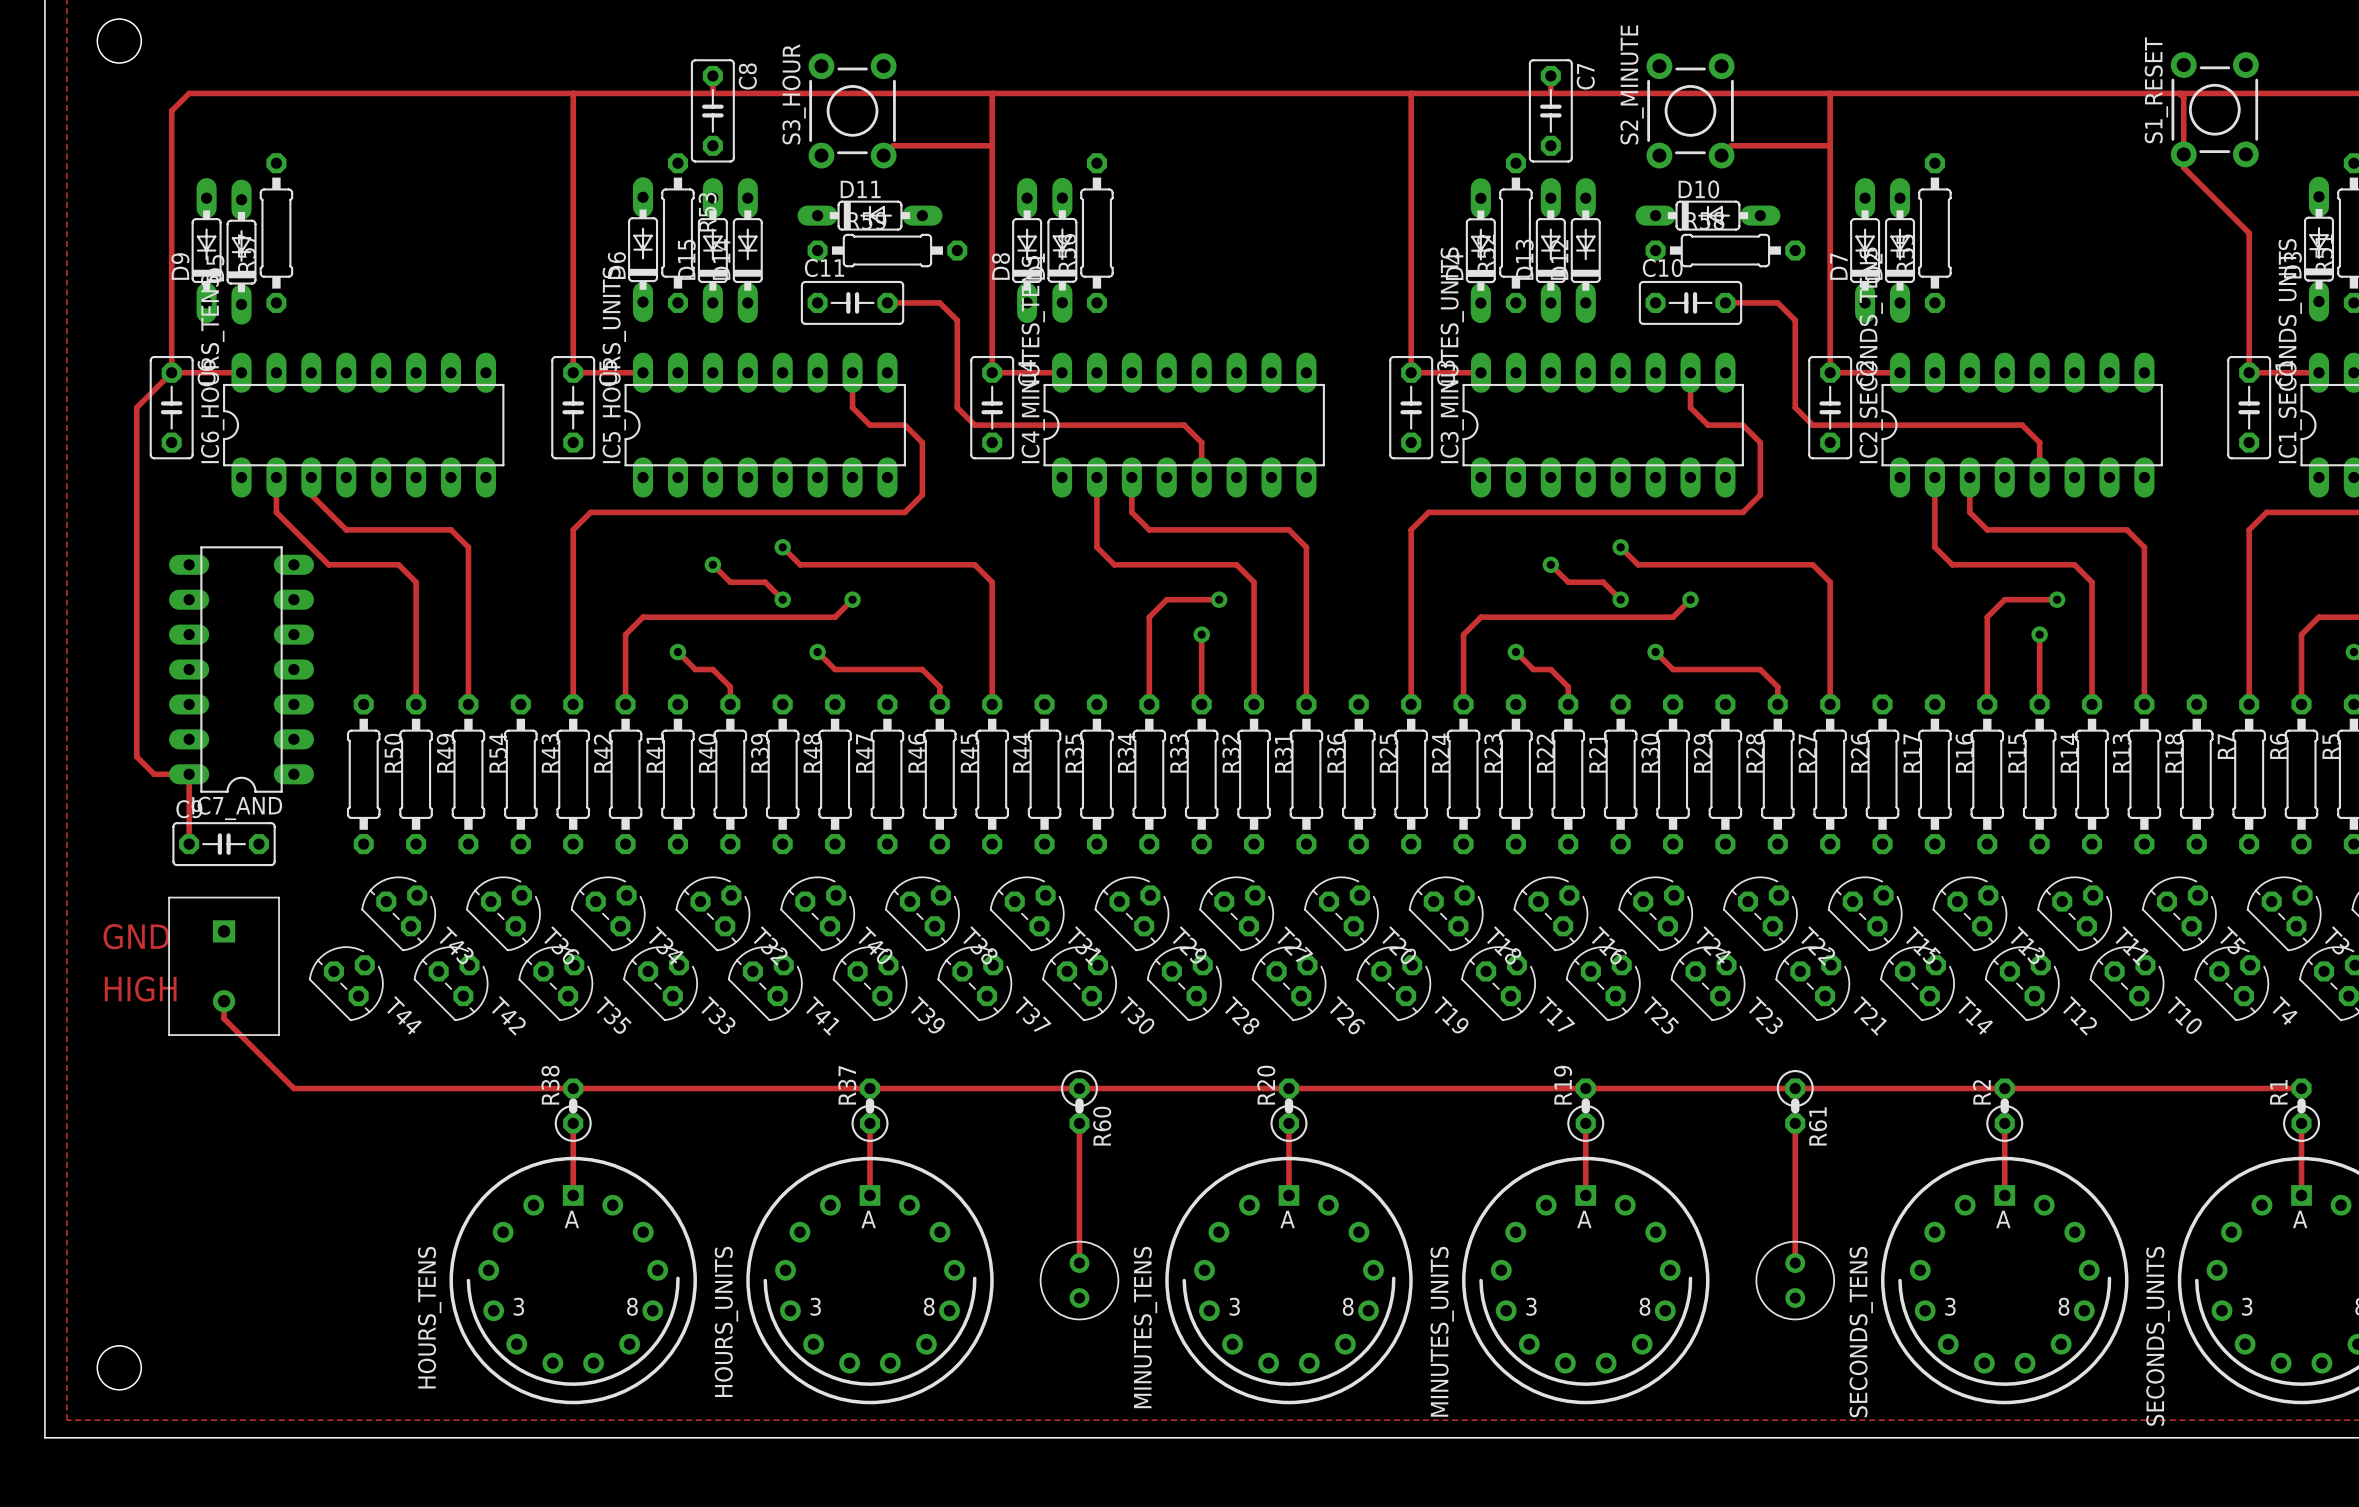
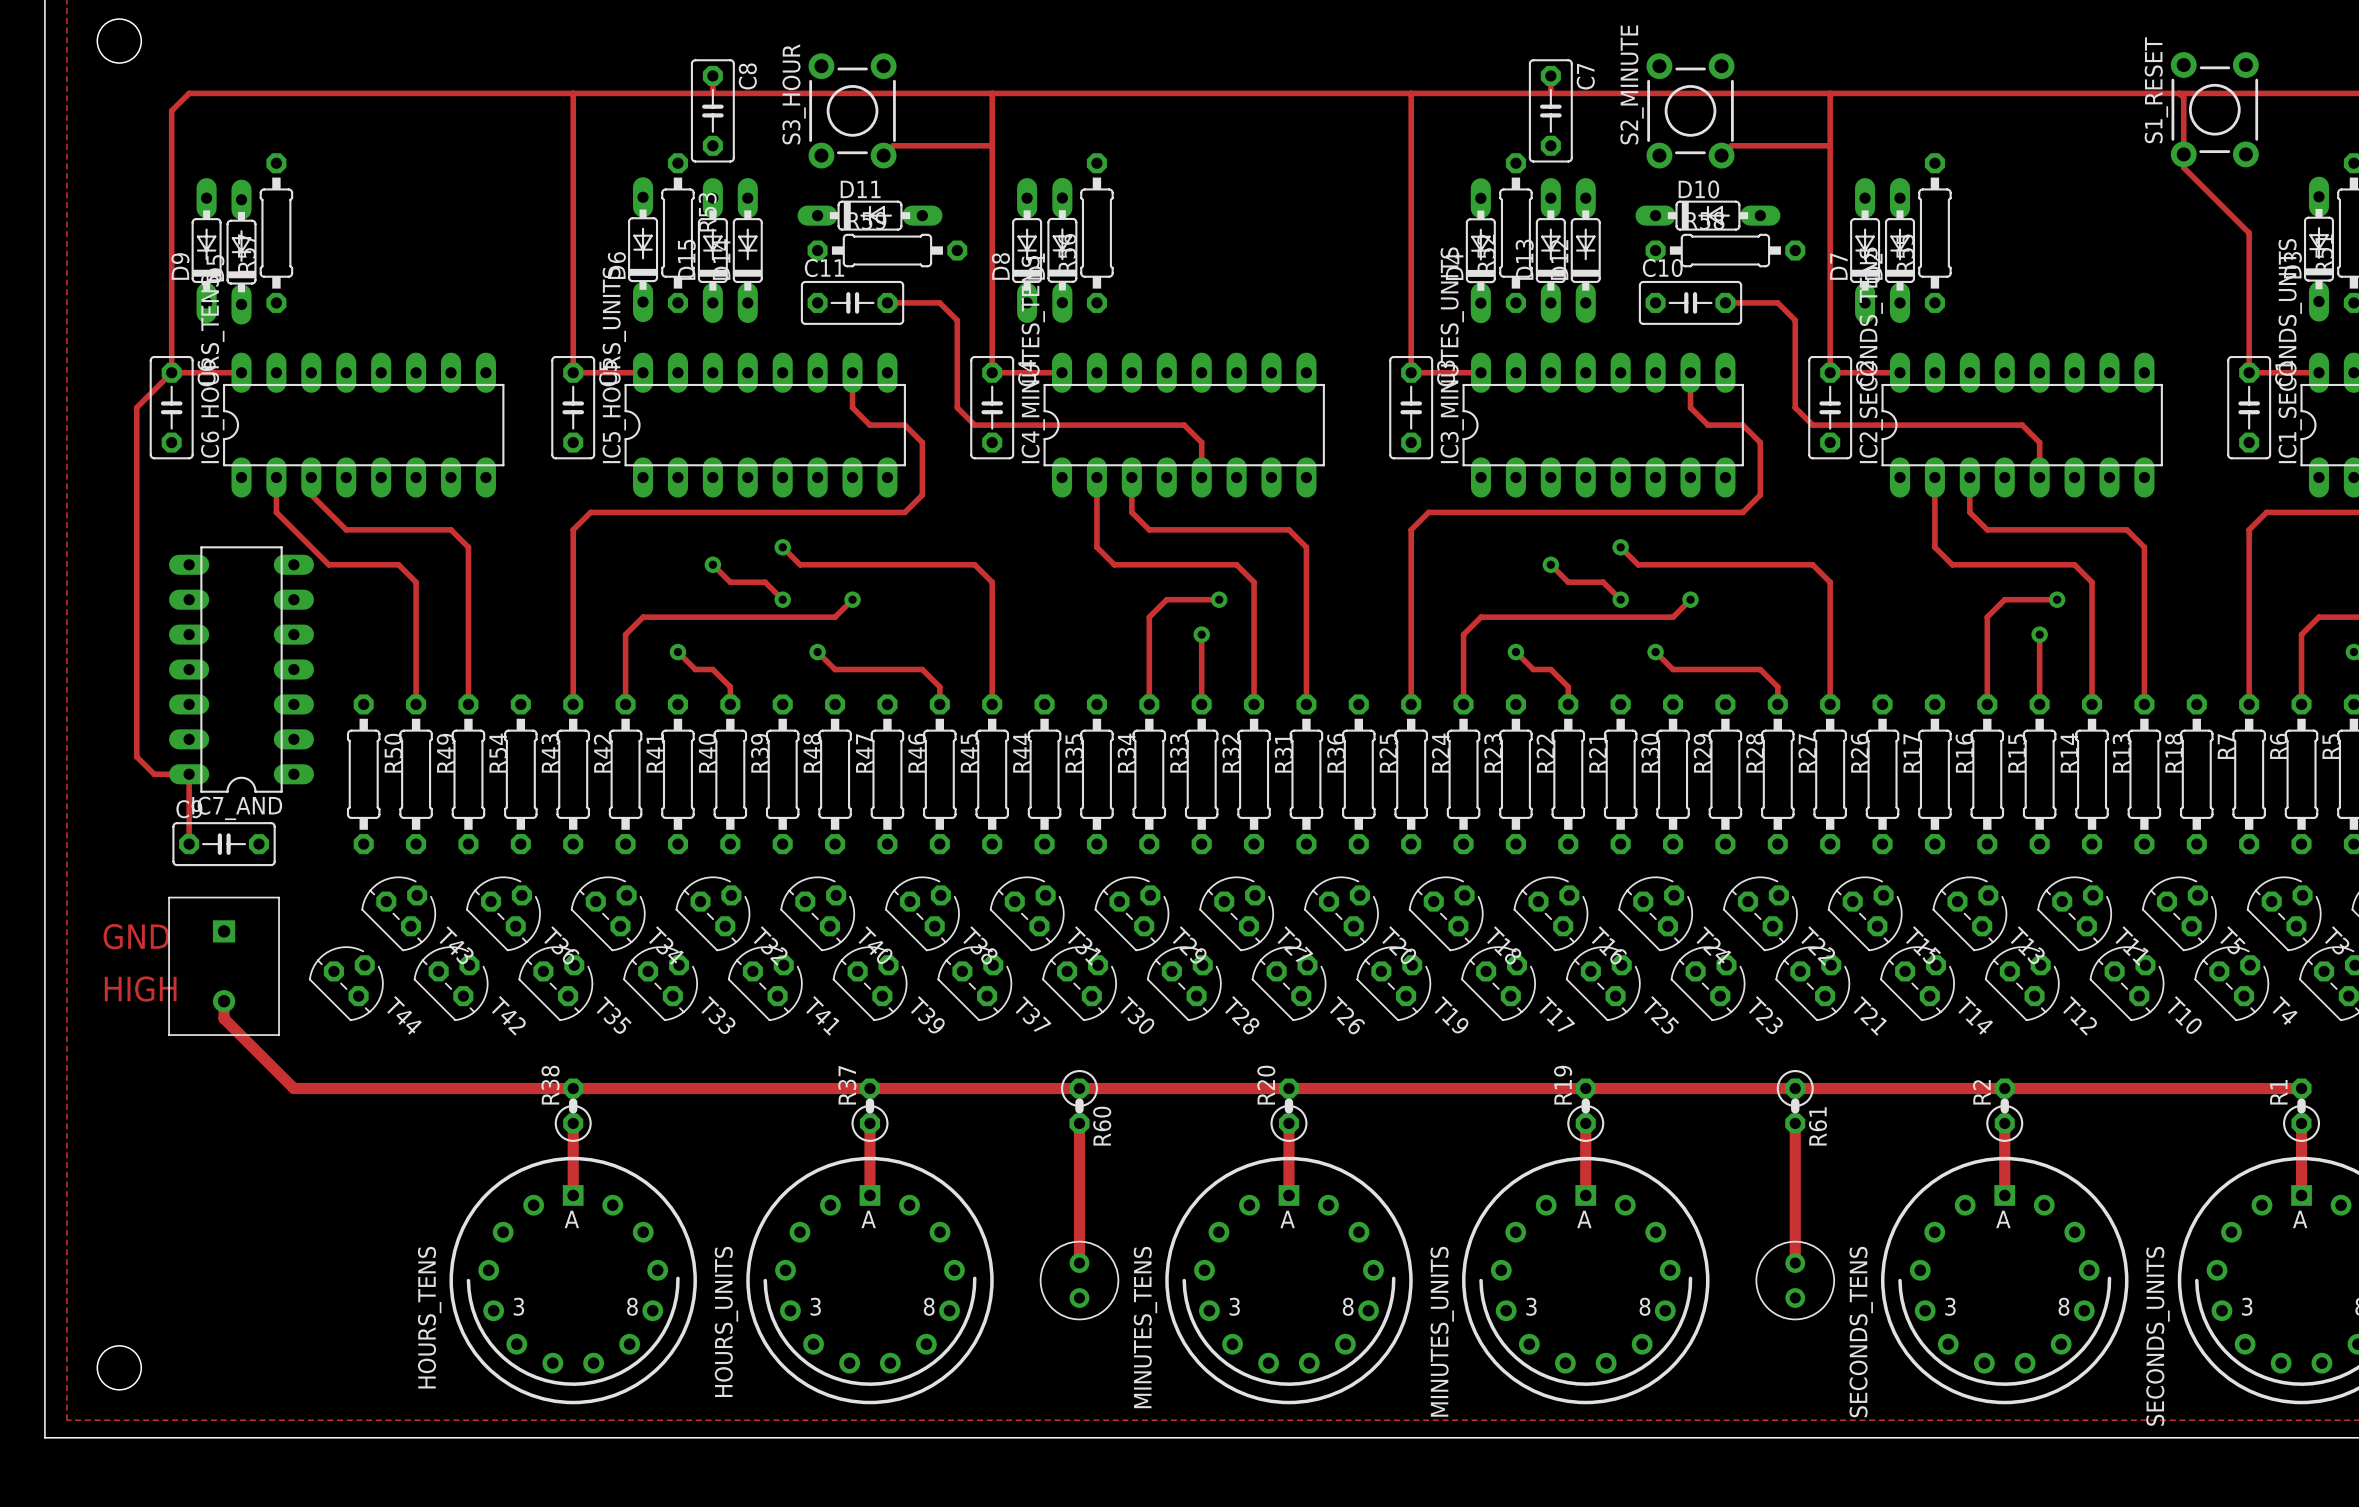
track width: thin (224, 1001) (224, 1018) (293, 1088) (2301, 1088) -> thick (224, 1001) (224, 1018) (293, 1088) (2301, 1088)
track width: thin (573, 1123) (573, 1195) -> thick (573, 1123) (573, 1195)
track width: thin (869, 1123) (869, 1195) -> thick (869, 1123) (869, 1195)
track width: thin (1079, 1123) (1079, 1263) -> thick (1079, 1123) (1079, 1263)
track width: thin (1288, 1123) (1288, 1195) -> thick (1288, 1123) (1288, 1195)
track width: thin (1585, 1123) (1585, 1195) -> thick (1585, 1123) (1585, 1195)
track width: thin (1795, 1123) (1795, 1263) -> thick (1795, 1123) (1795, 1263)
track width: thin (2004, 1123) (2004, 1195) -> thick (2004, 1123) (2004, 1195)
track width: thin (2301, 1123) (2301, 1195) -> thick (2301, 1123) (2301, 1195)

